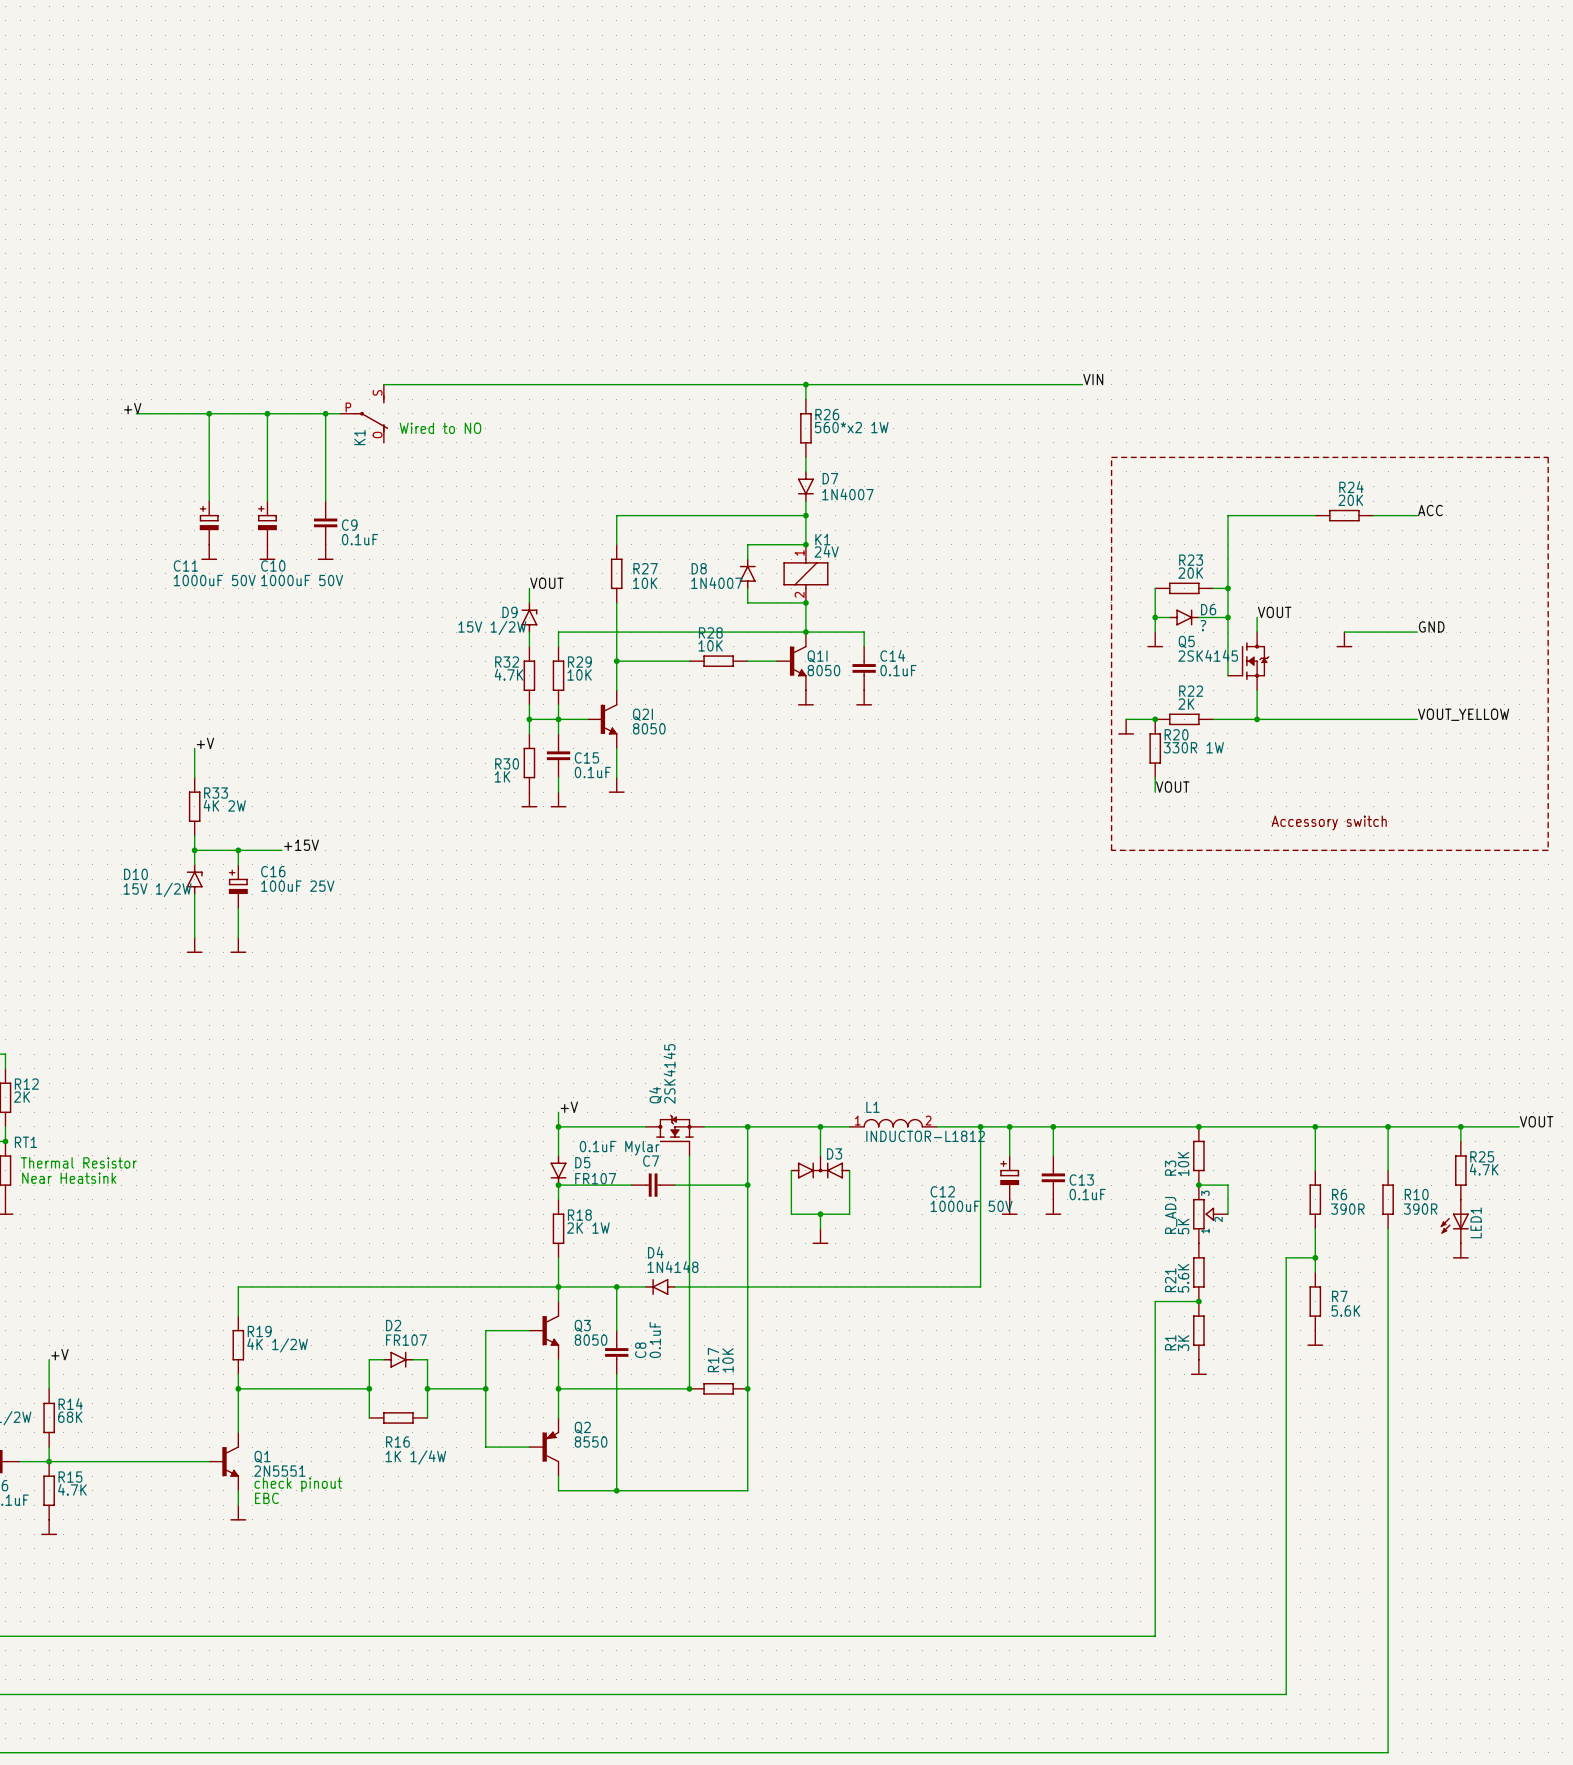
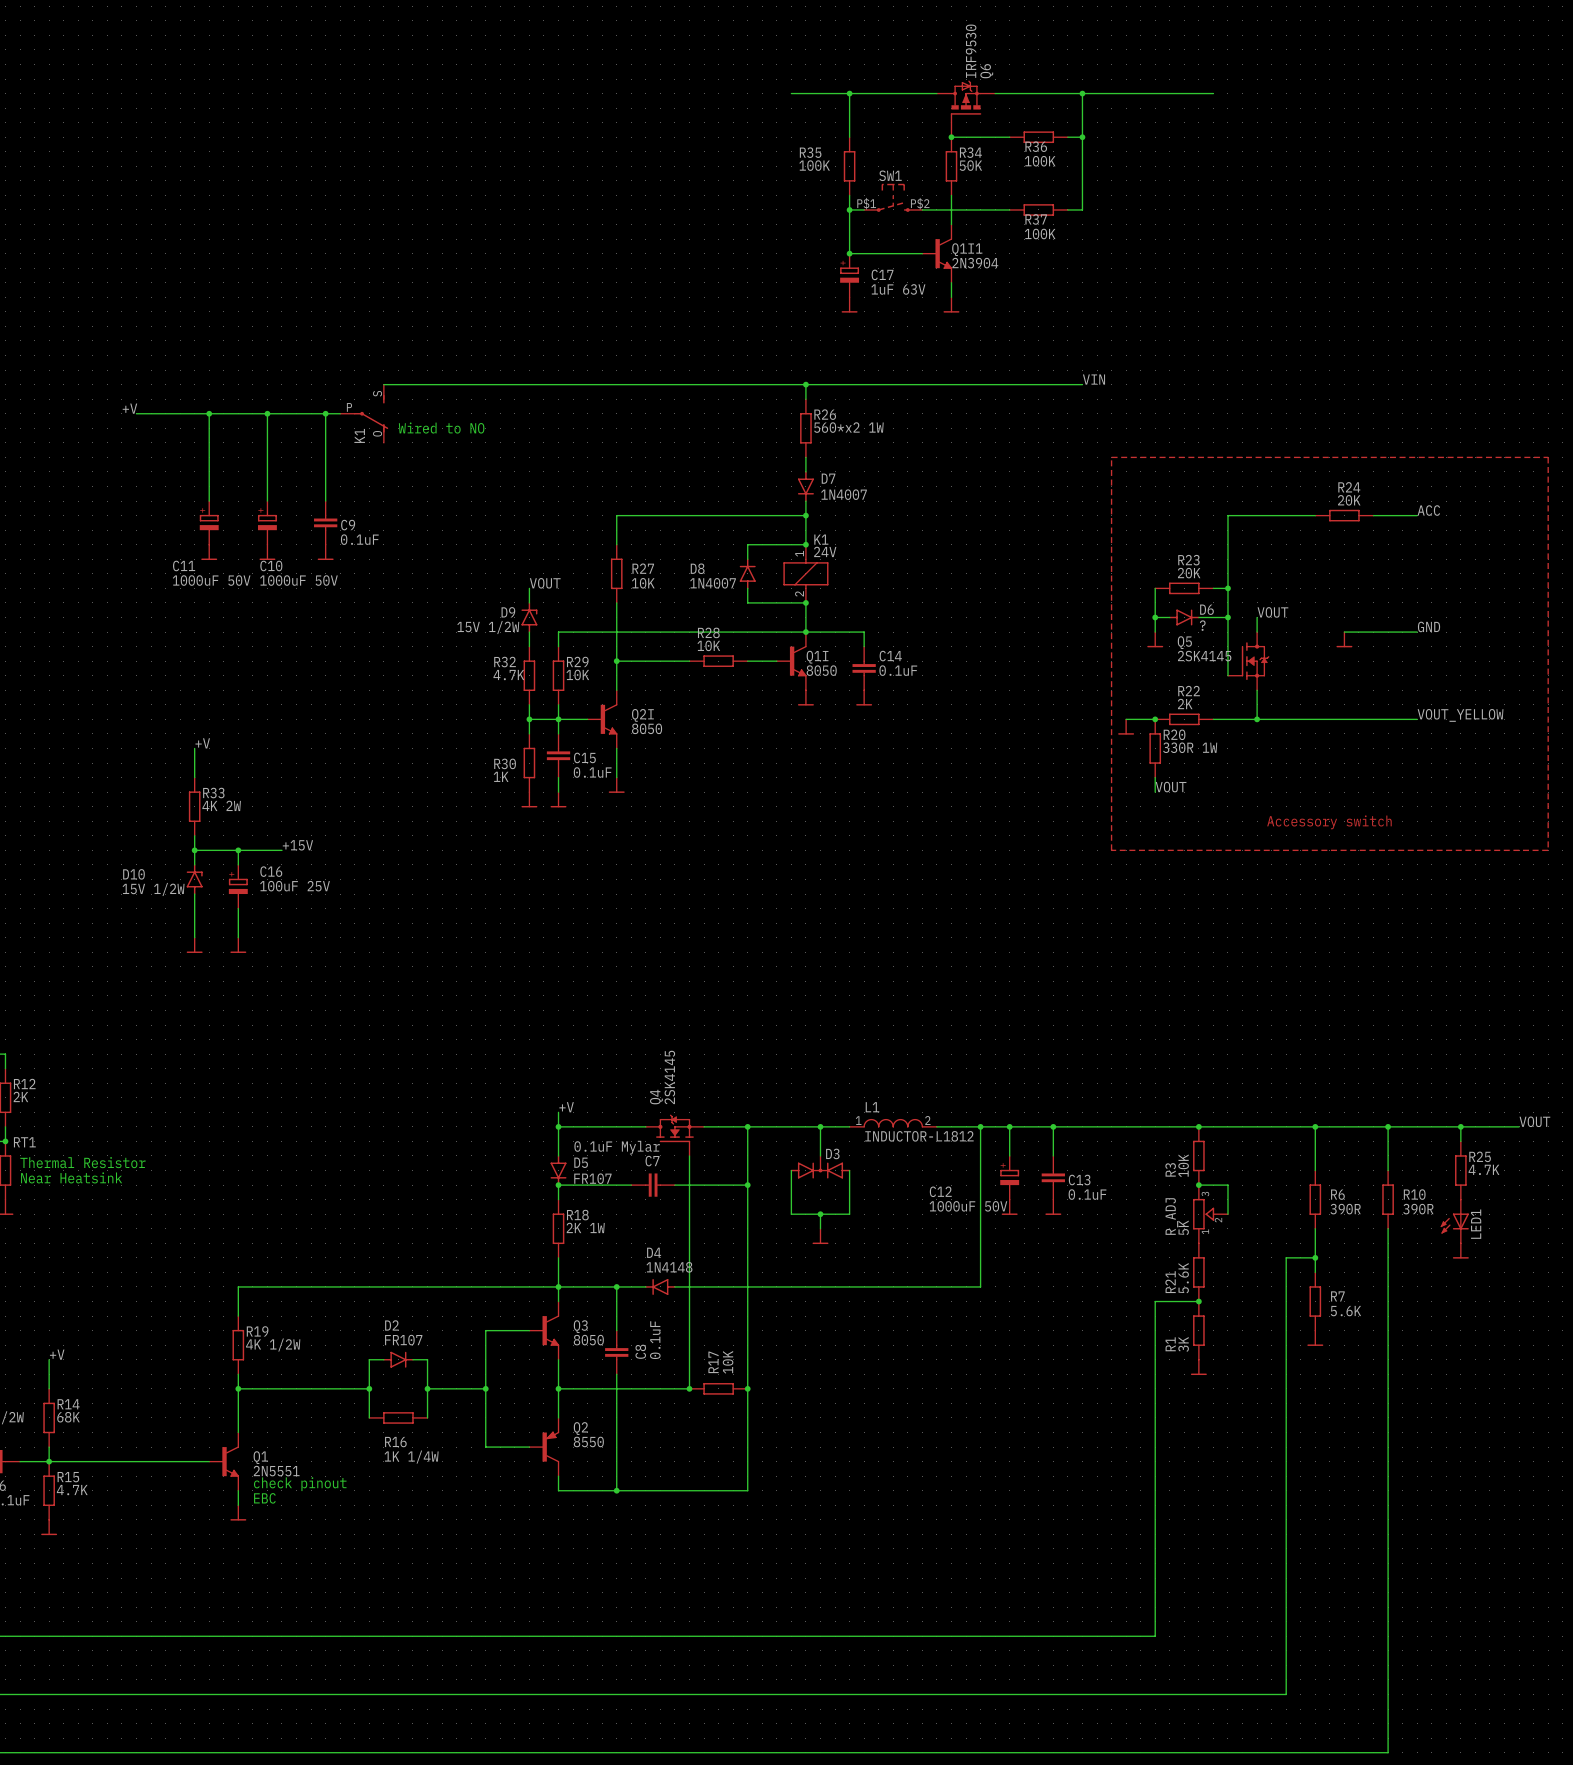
wire: none -> (791, 93) (936, 93)
wire: none -> (849, 93) (849, 137)
junction: none -> (849, 93)
wire: none -> (995, 93) (1213, 93)
wire: none -> (1082, 93) (1082, 209) (1067, 209)
junction: none -> (1082, 93)
Q6: none -> IRF9530 (966, 108)
wire: none -> (951, 137) (1009, 137)
junction: none -> (951, 137)
R36: none -> 100K (1038, 137)
wire: none -> (1067, 137) (1082, 137)
junction: none -> (1082, 137)
R35: none -> 100K (849, 166)
R34: none -> 50K (951, 166)
wire: none -> (849, 195) (849, 253) (922, 253)
wire: none -> (951, 195) (951, 224)
SW1: none -> (893, 197)
wire: none -> (849, 209) (864, 209)
junction: none -> (849, 209)
wire: none -> (922, 209) (1009, 209)
R37: none -> 100K (1038, 209)
junction: none -> (849, 253)
Q1I1: none -> 2N3904 (937, 253)
C17: none -> 1uF 63V (849, 275)
wire: none -> (951, 282) (951, 297)
power symbol: none -> (849, 304)
power symbol: none -> (951, 304)

